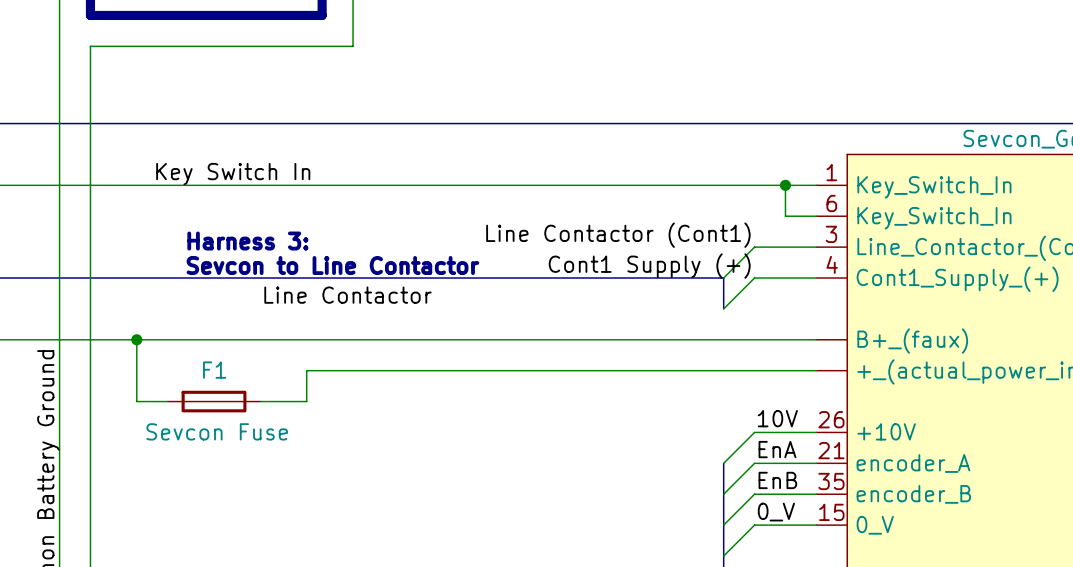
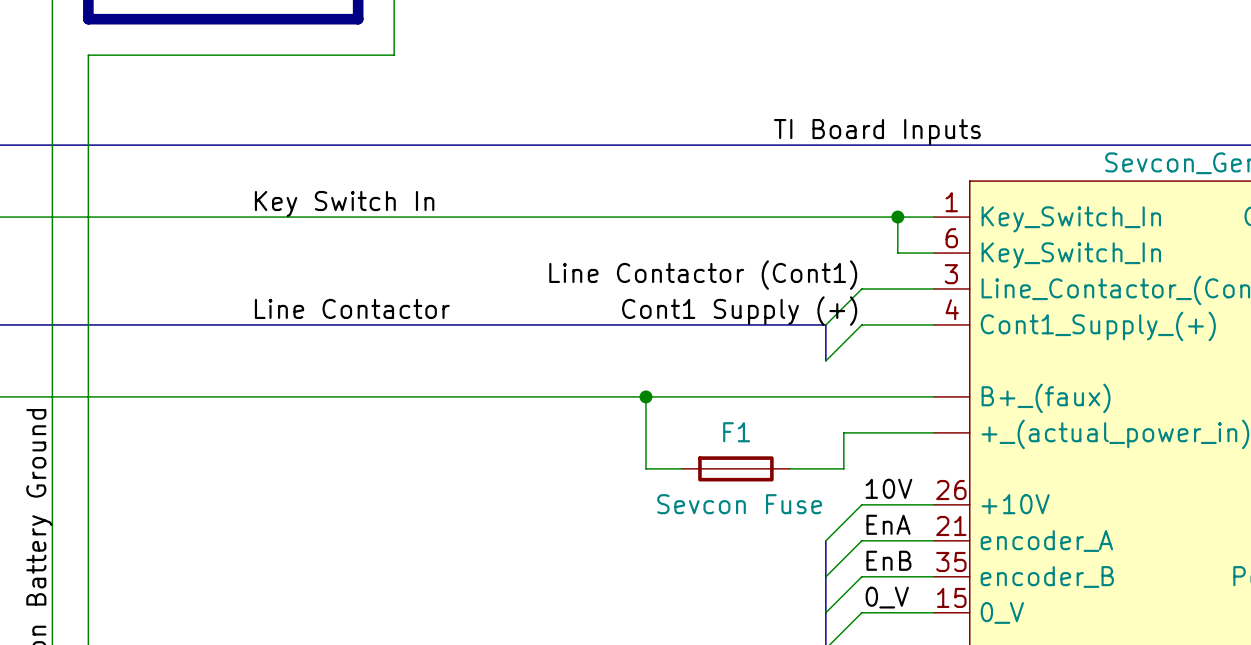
label: none -> TI Board Inputs (877, 132)
label position: Key Switch In (233, 174) -> Key Switch In (344, 204)
text: Harness 3: (247, 241) -> none
text: Sevcon to Line Contactor (332, 265) -> none
label position: Line Contactor (347, 295) -> Line Contactor (352, 308)
wire: (136, 339) (136, 401) (167, 401) -> none
junction: (136, 339) -> none
wire: none -> (645, 396) (645, 468) (681, 468)
junction: none -> (645, 396)
wire: (739, 370) (306, 370) (306, 401) (260, 401) -> (843, 432) (843, 468) (789, 468)
F1 position: (214, 401) -> (735, 468)

